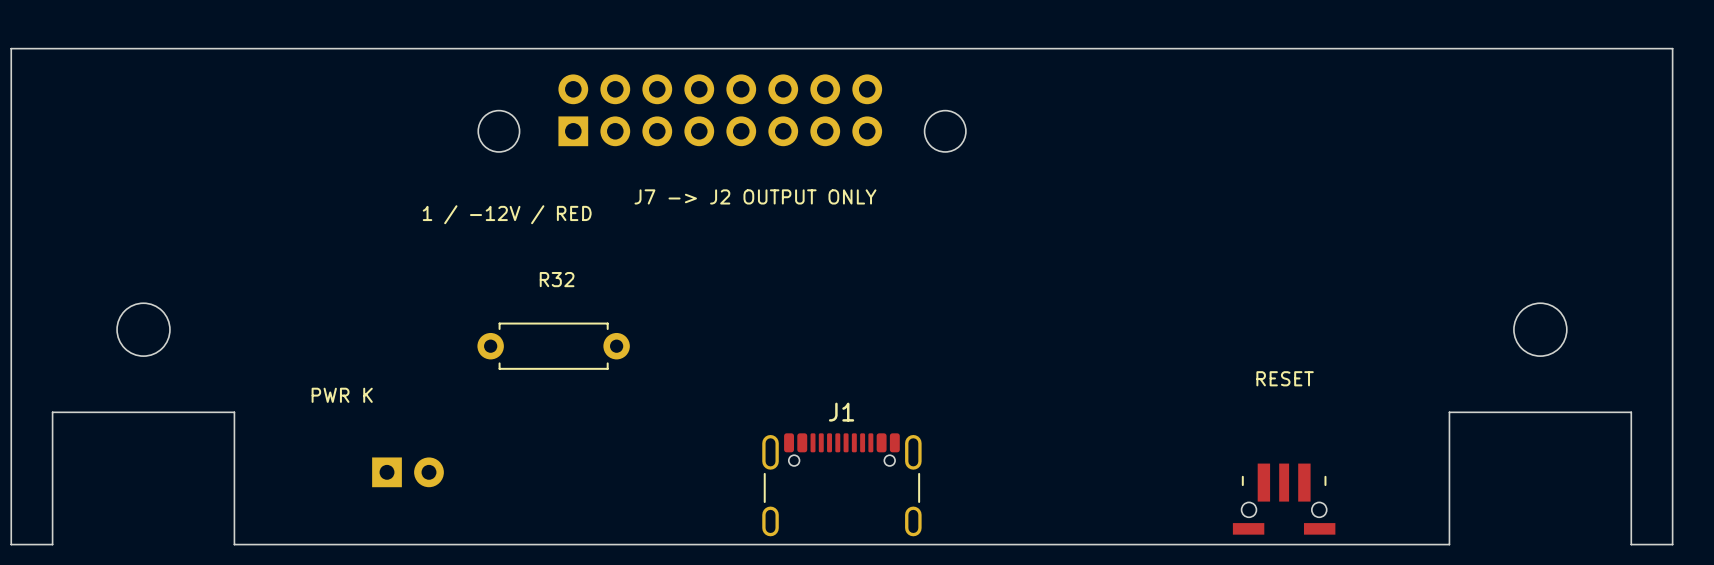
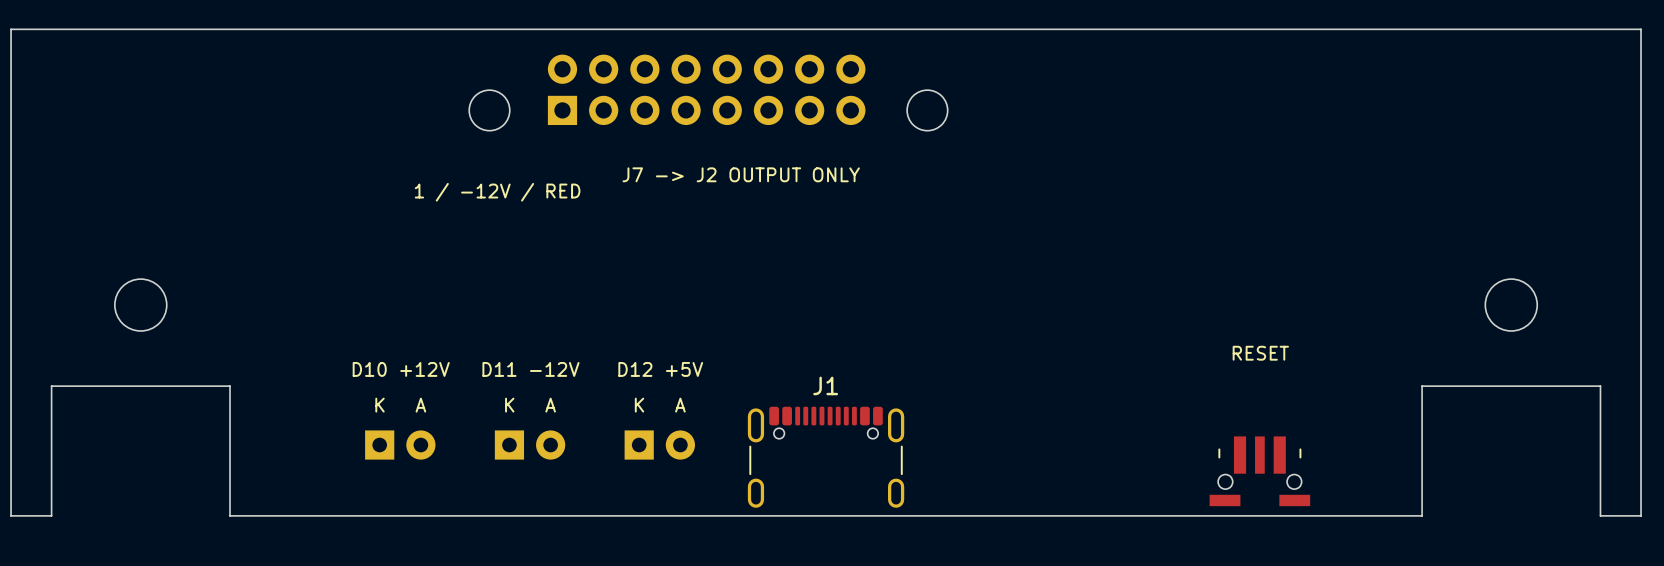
text: R32 (557, 279) -> none
part: (553, 346) -> none
text: PWR K (342, 395) -> none
text: none -> D10 +12V (401, 369)
text: none -> D11 -12V (530, 369)
text: none -> D12 +5V (660, 369)
text: none -> K (380, 405)
text: none -> A (420, 405)
text: none -> K (509, 405)
text: none -> A (550, 405)
text: none -> K (639, 405)
text: none -> A (680, 405)
part: none -> (530, 445)
part: none -> (659, 445)

